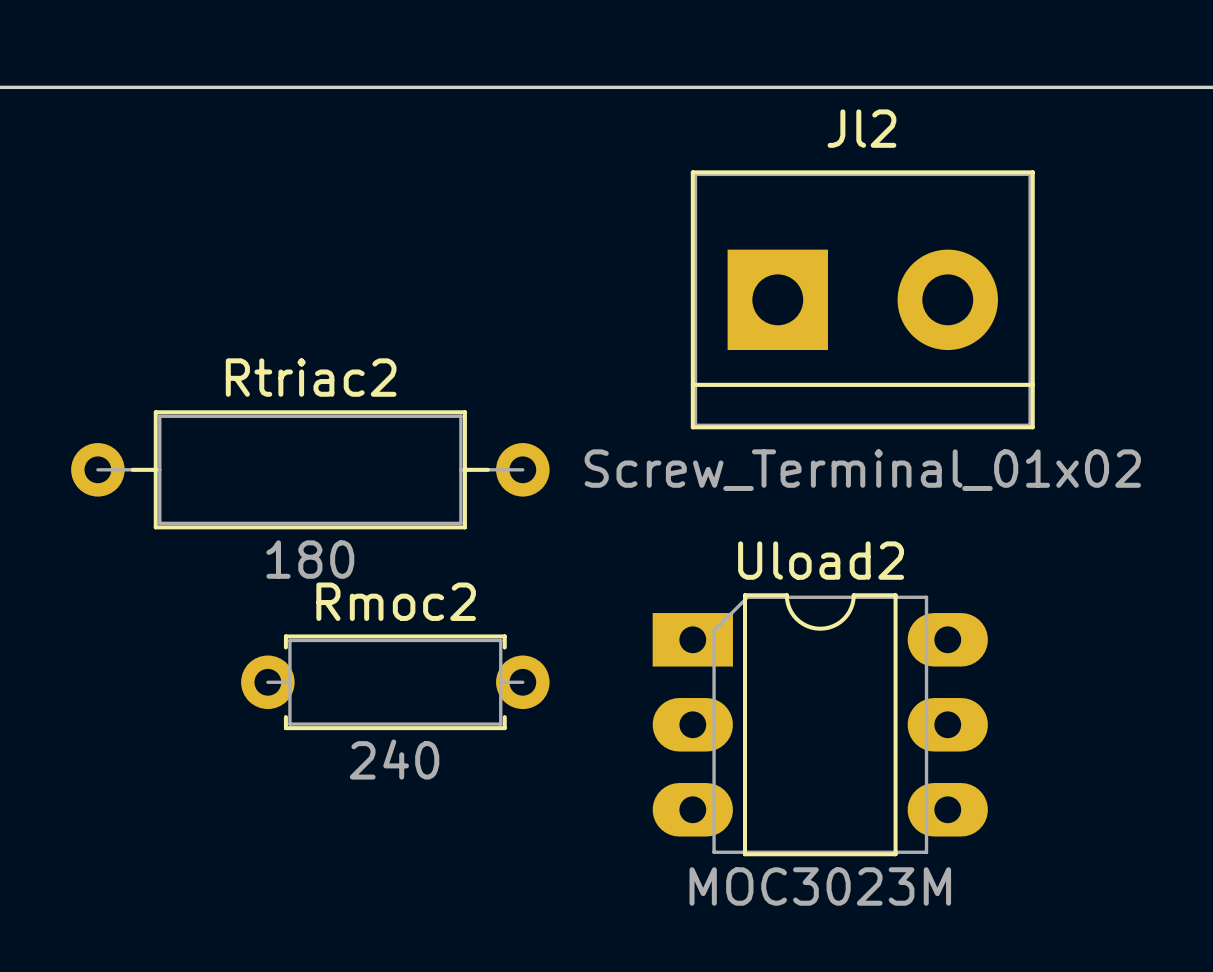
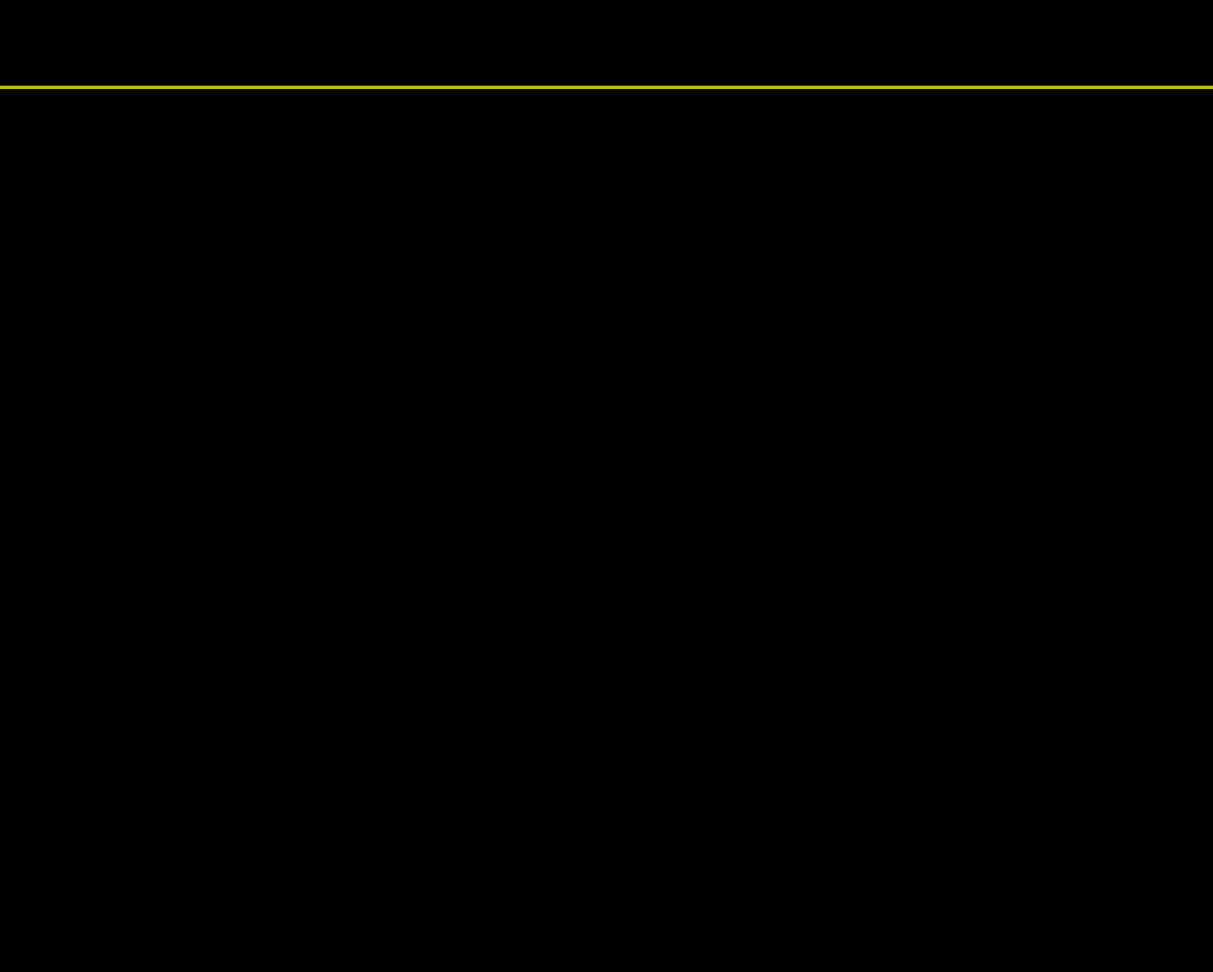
Jl2: Screw_Terminal_01x02 (862, 299) -> none
Rtriac2: 180 (310, 469) -> none
Rmoc2: 240 (395, 682) -> none
Uload2: MOC3023M (820, 724) -> none

